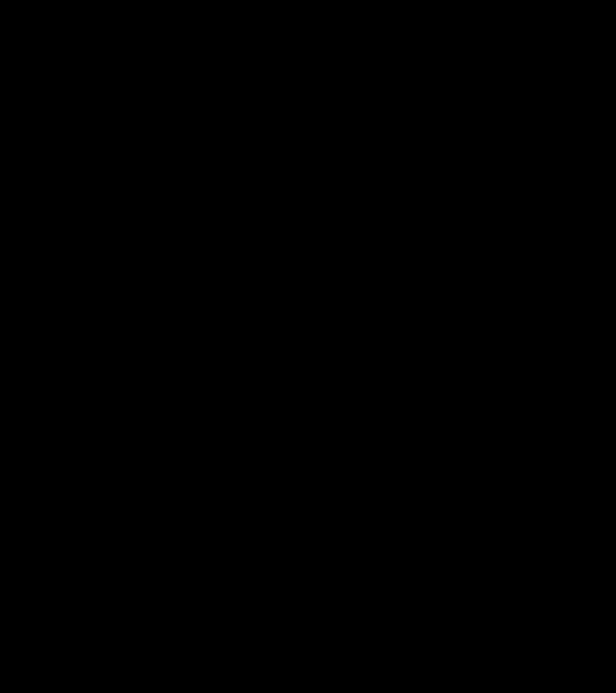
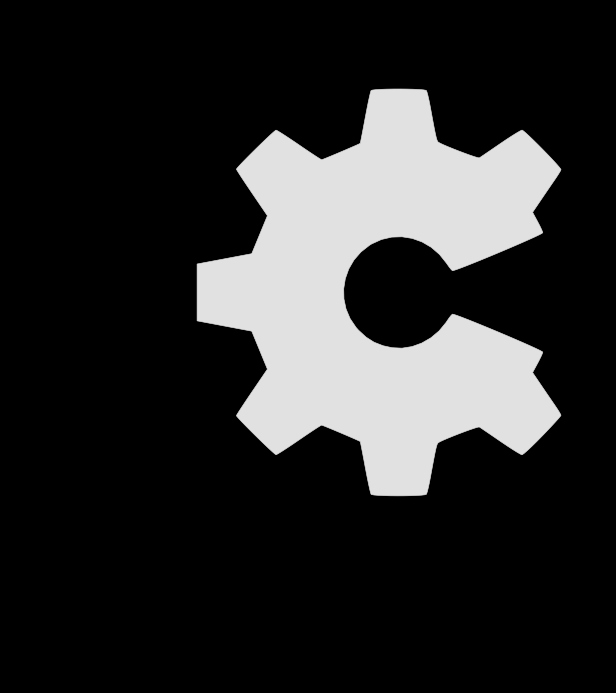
drawing: none -> [196, 88, 562, 497]

